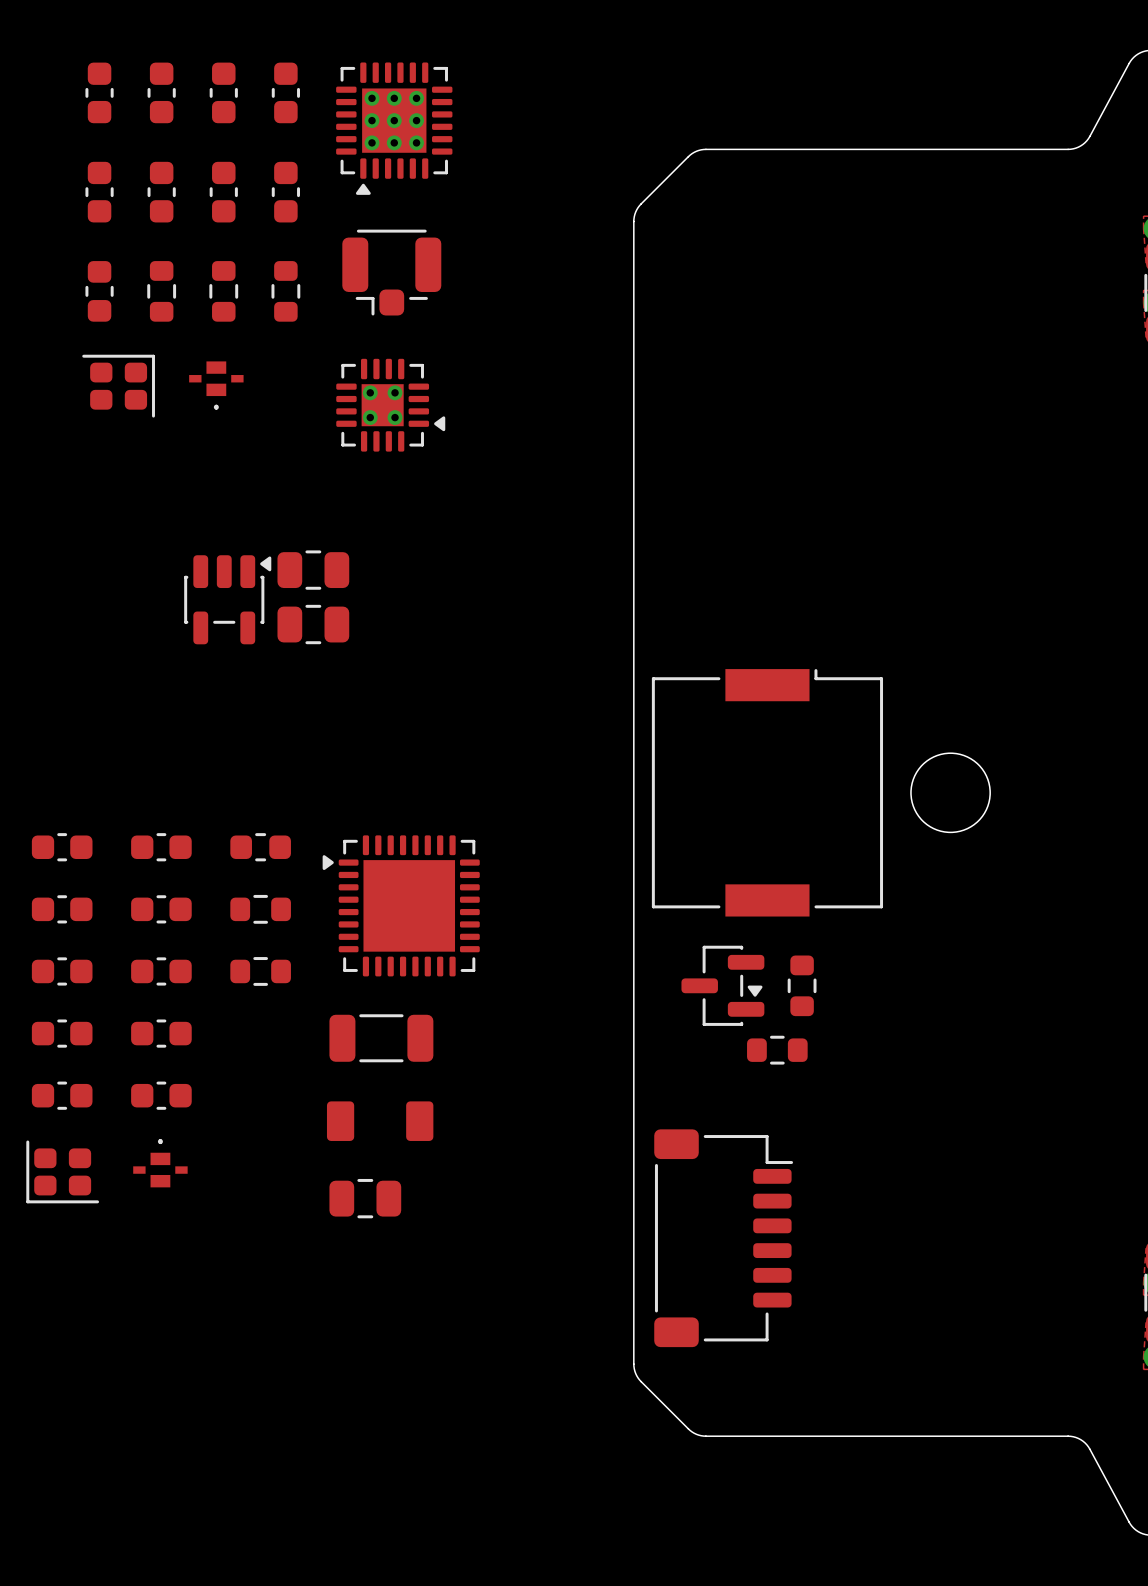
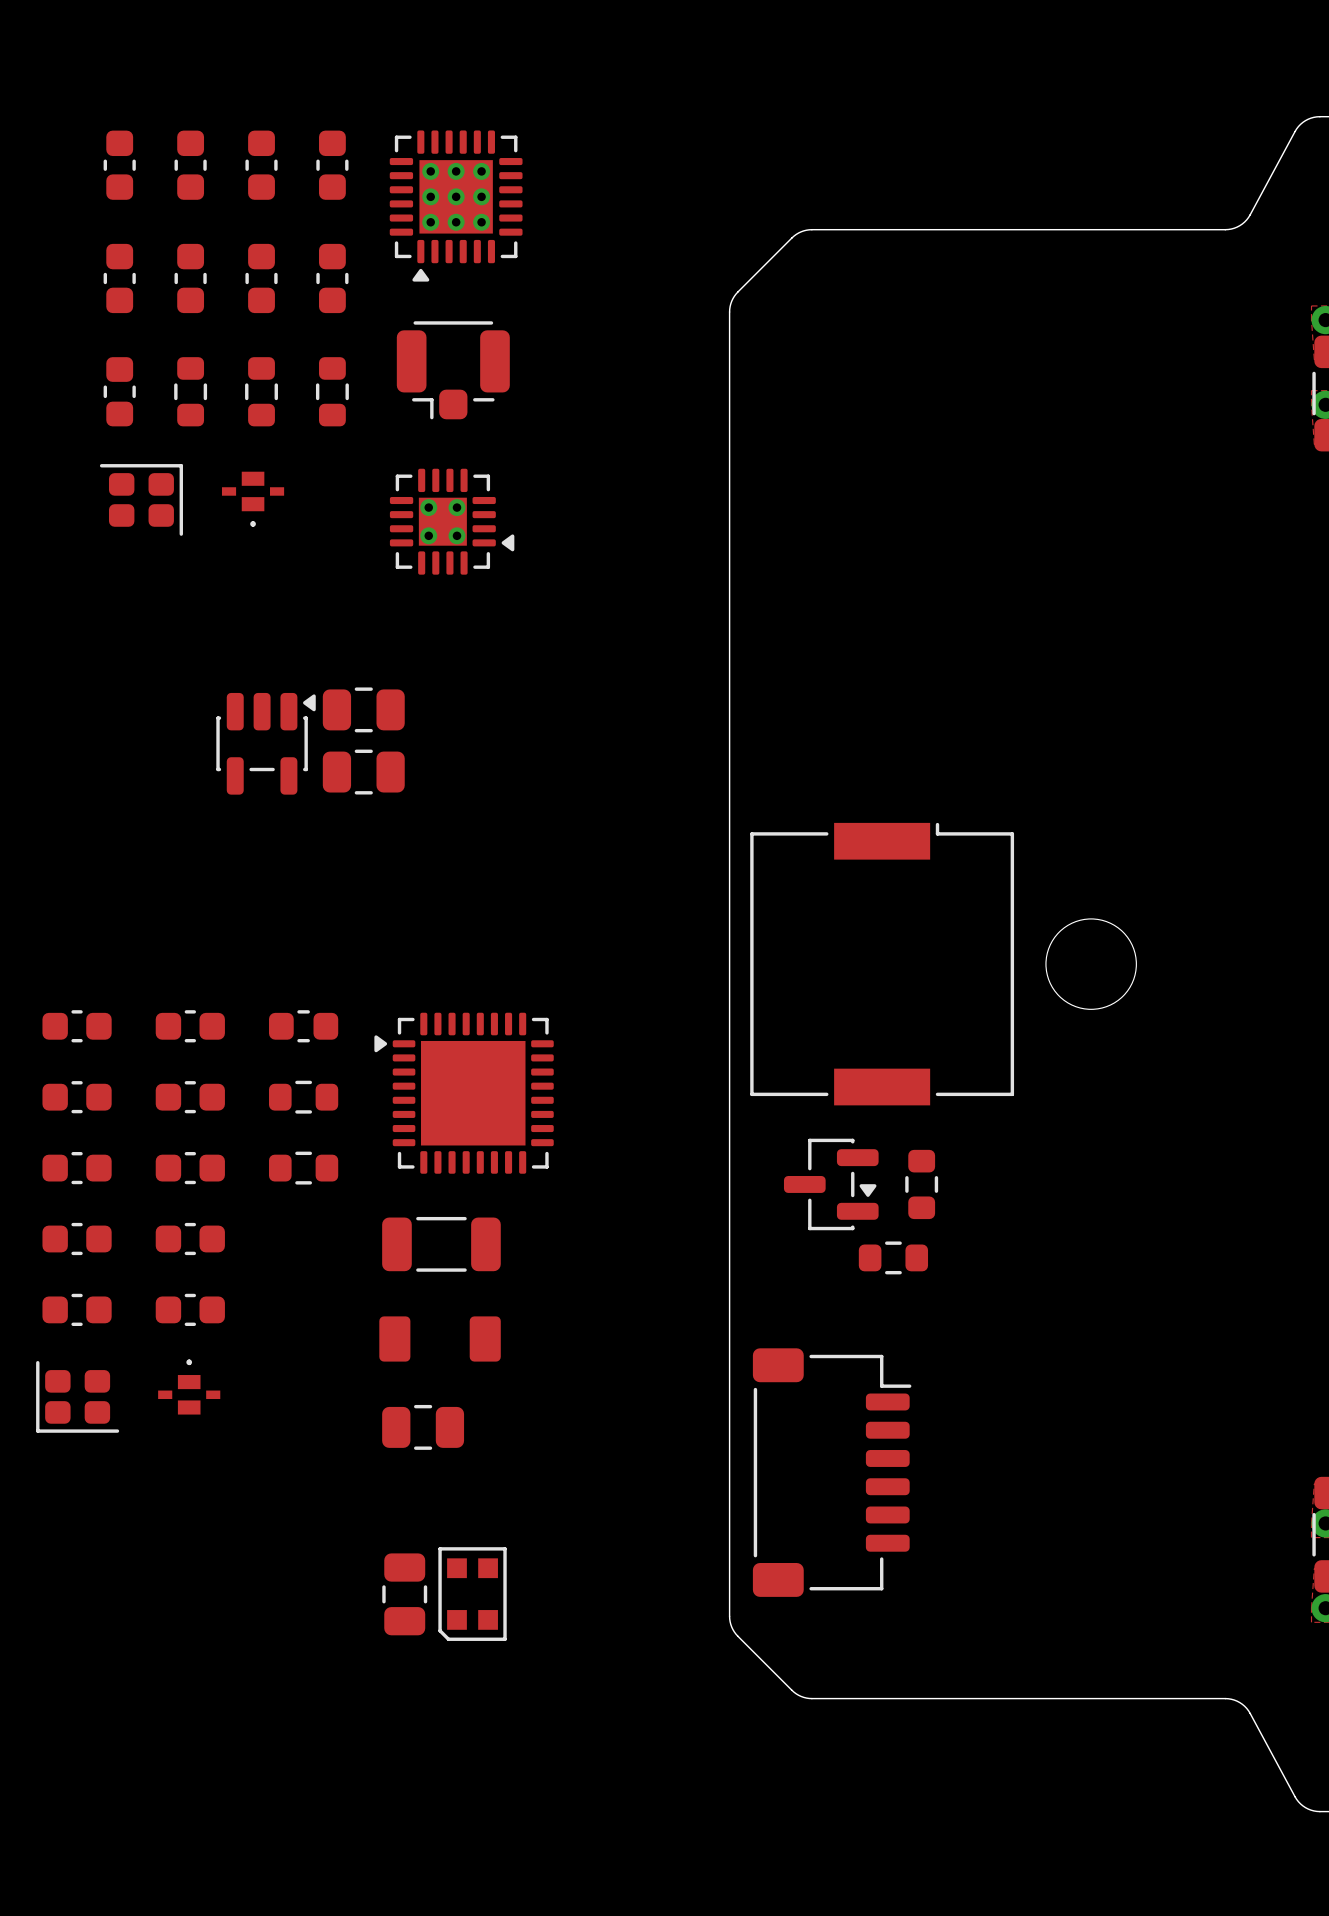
part: none -> (404, 1594)
part: none -> (472, 1594)

